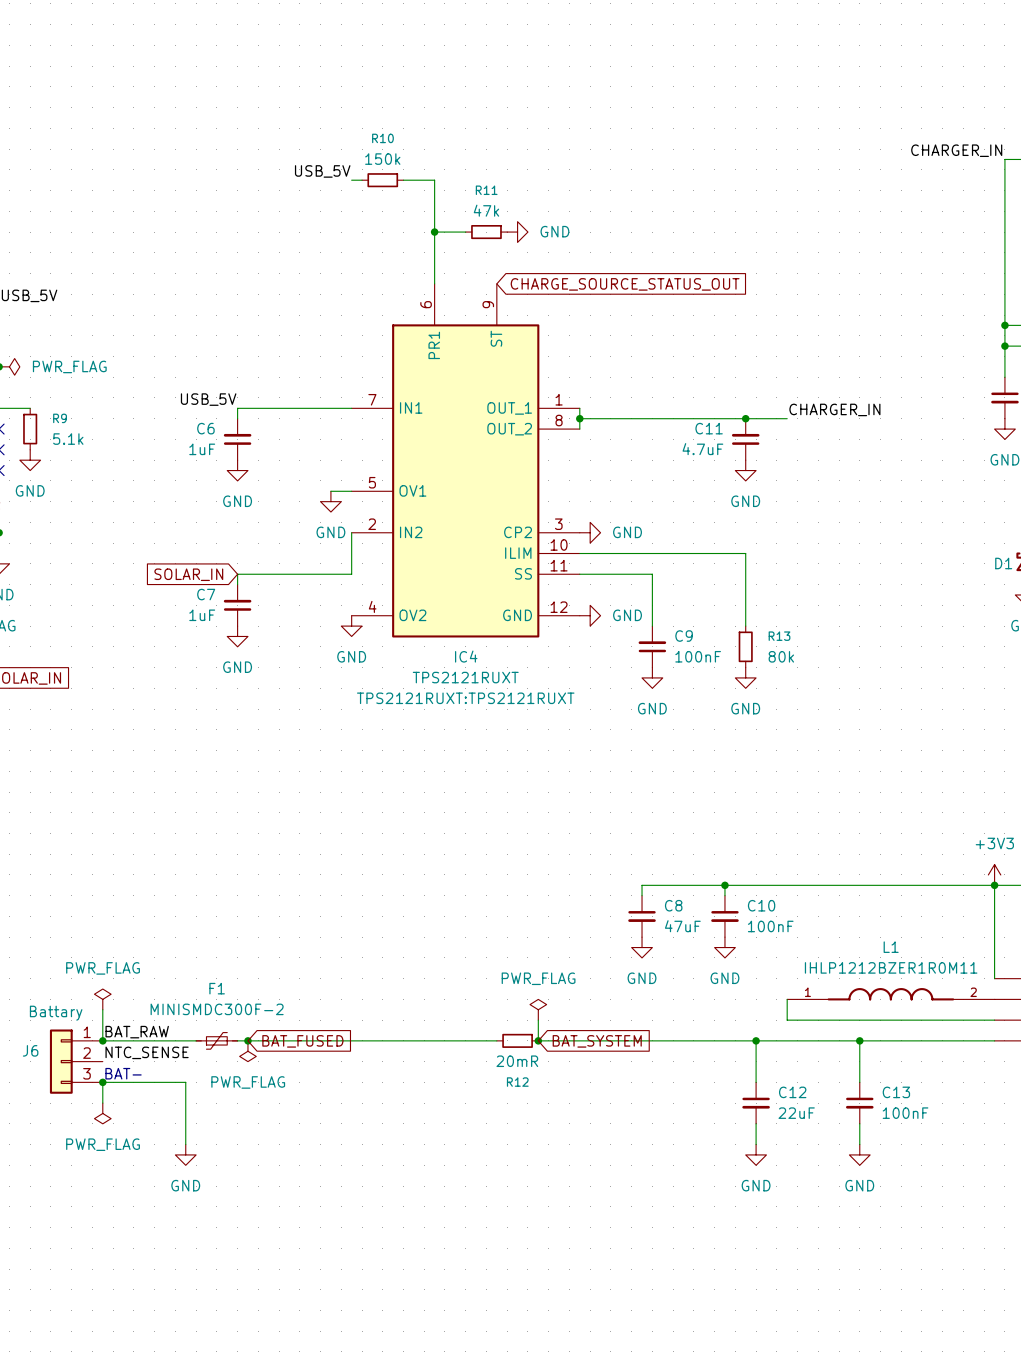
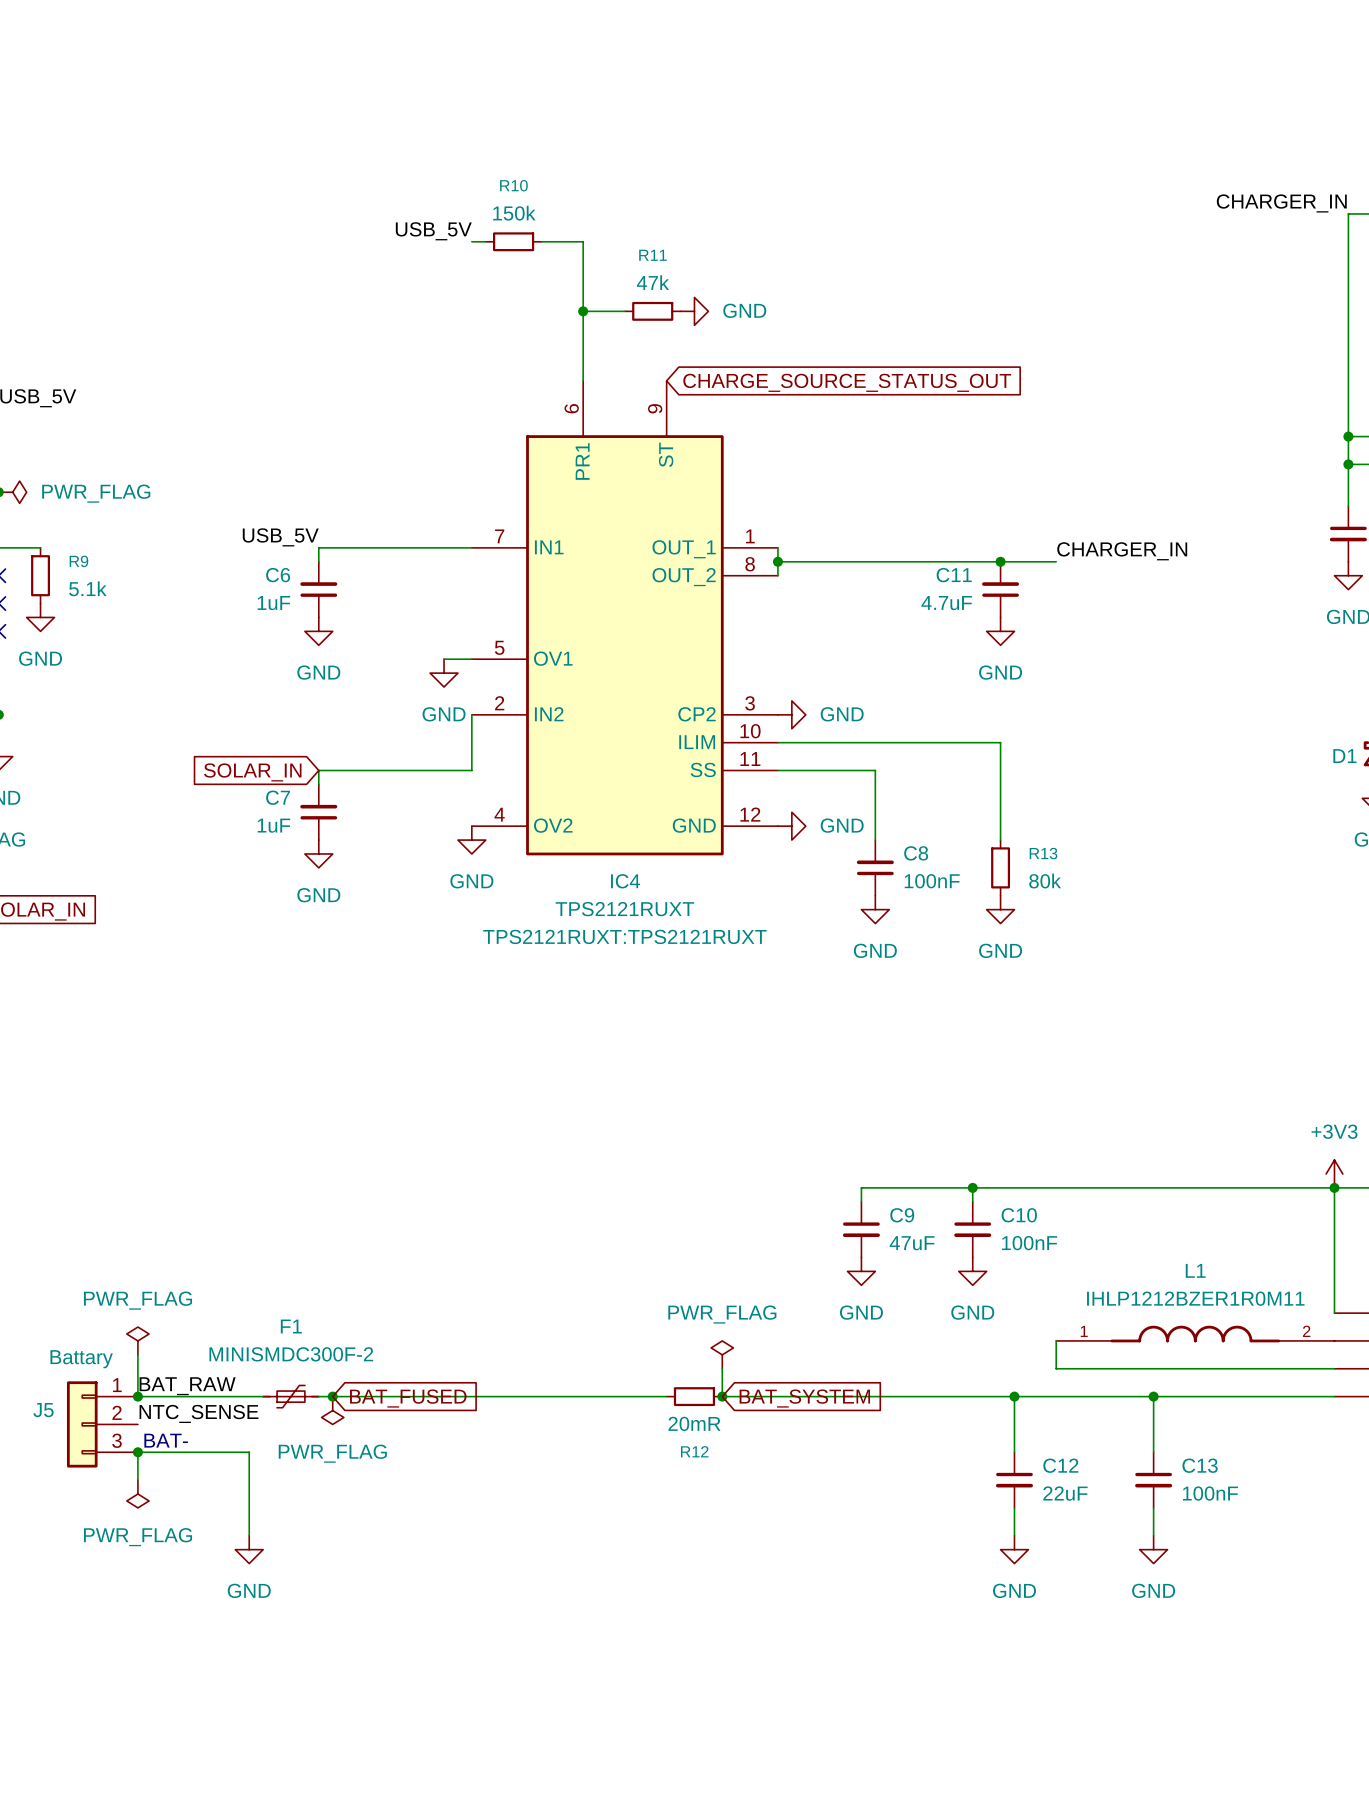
C9 name: C9 (684, 636) -> C8 (916, 853)
C8 name: C8 (673, 905) -> C9 (902, 1215)
J6 name: J6 (30, 1050) -> J5 (43, 1410)

